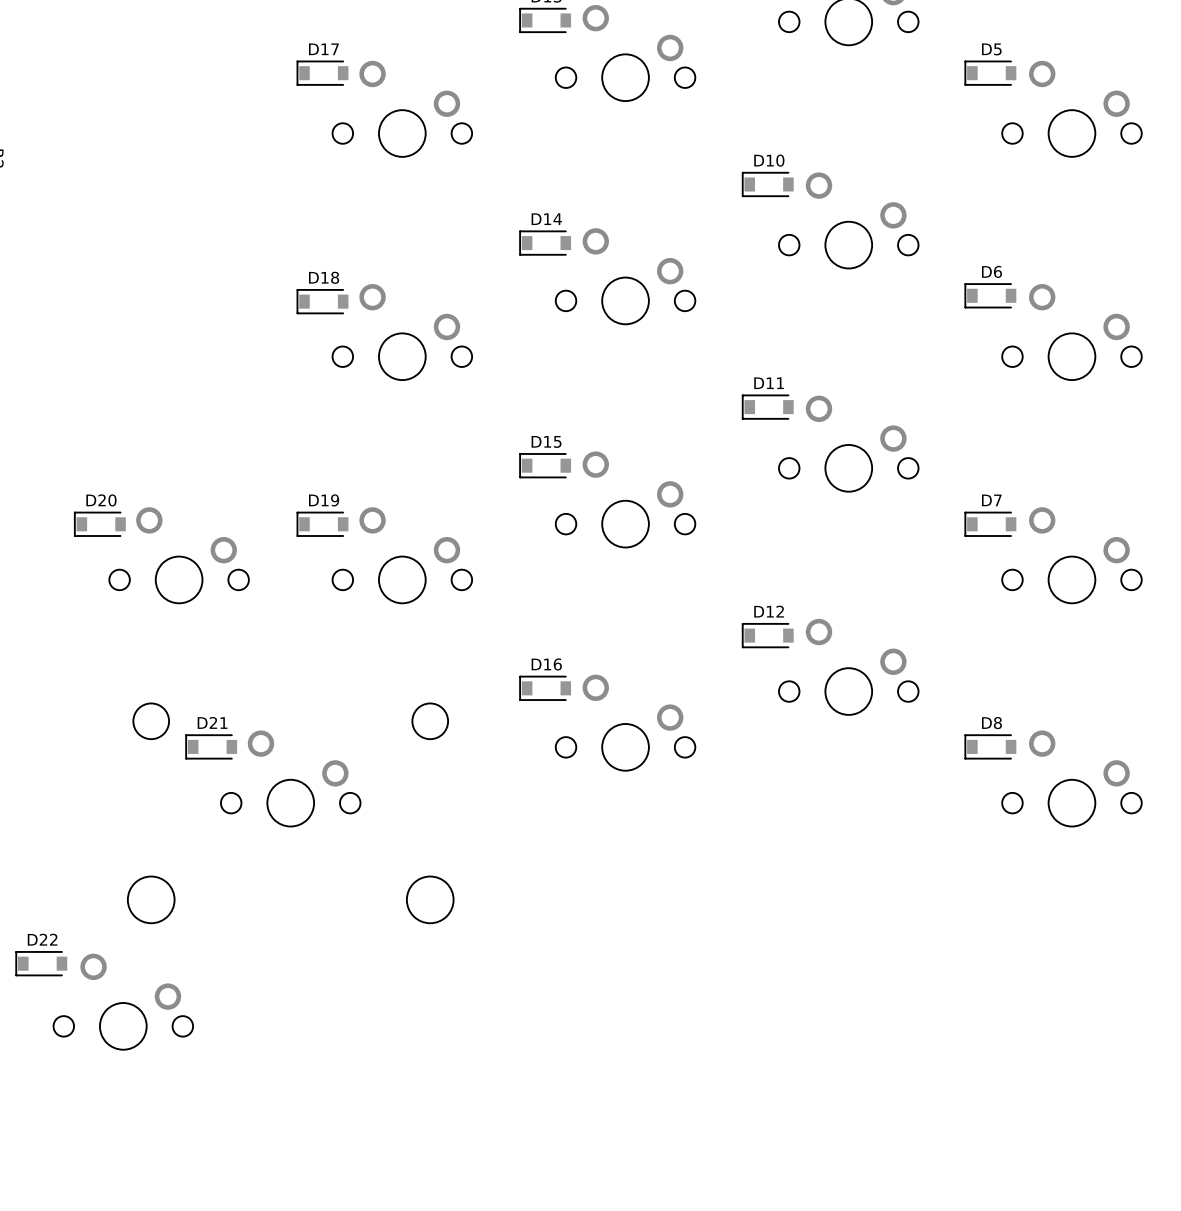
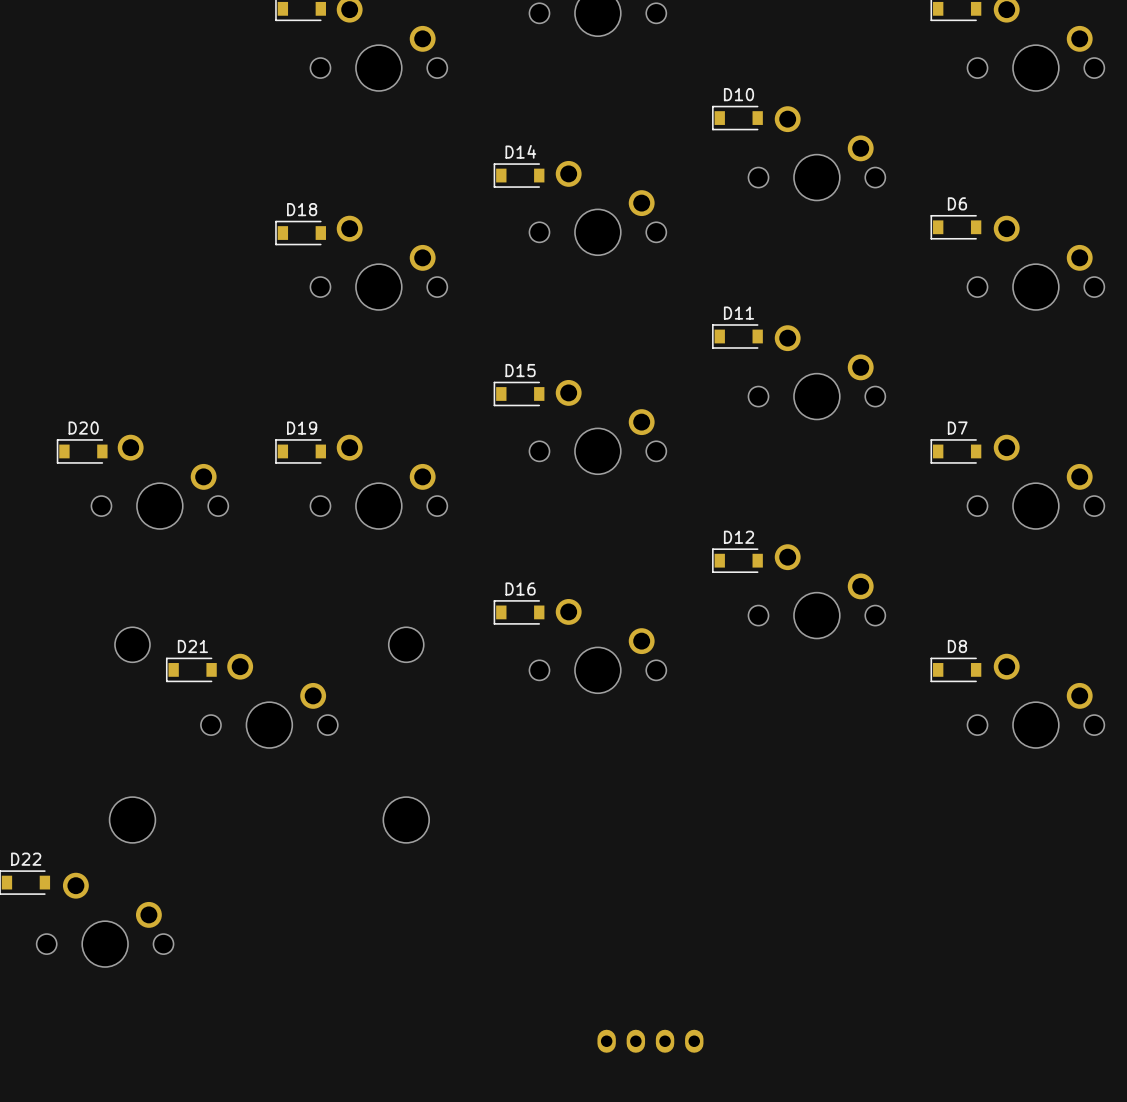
part: none -> (650, 1041)

